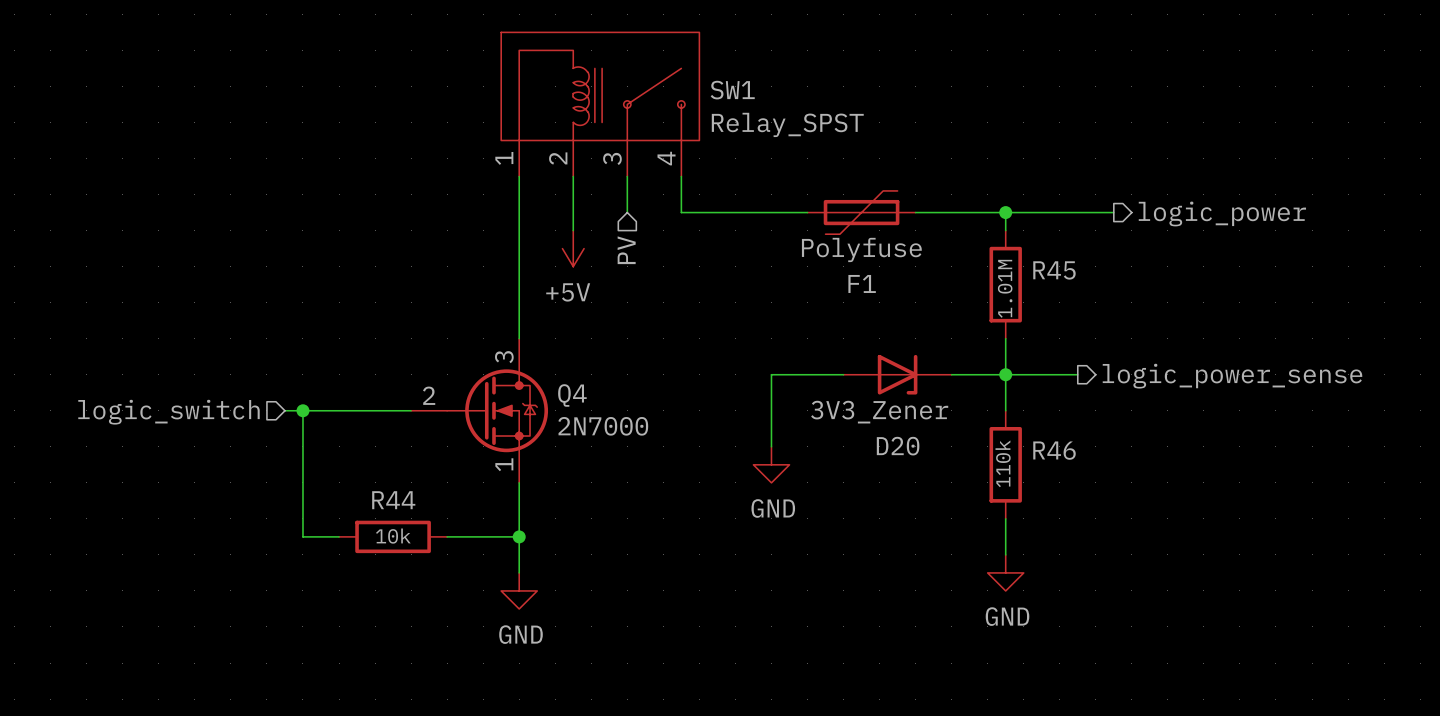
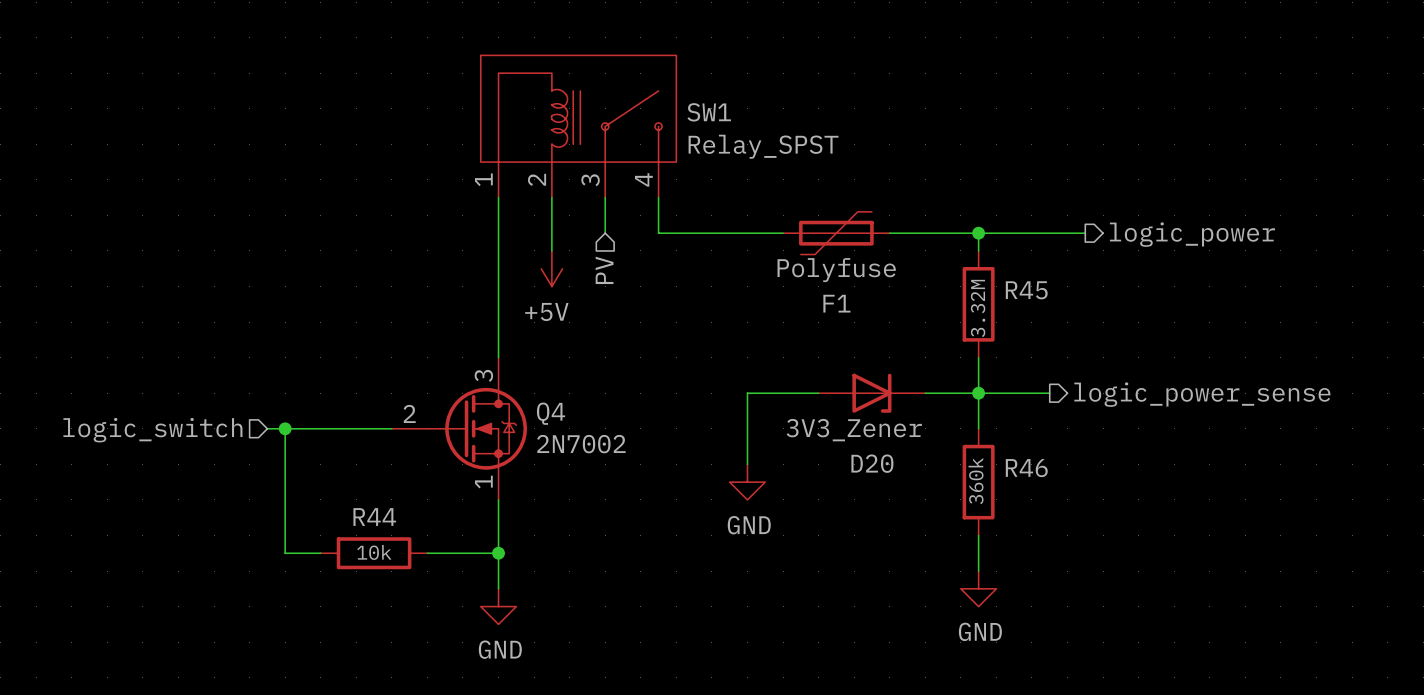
R45 value: 1.01M (1005, 288) -> 3.32M (978, 308)
Q4 value: 2N7000 (603, 426) -> 2N7002 (581, 444)
R46 value: 110k (1003, 463) -> 360k (976, 481)

